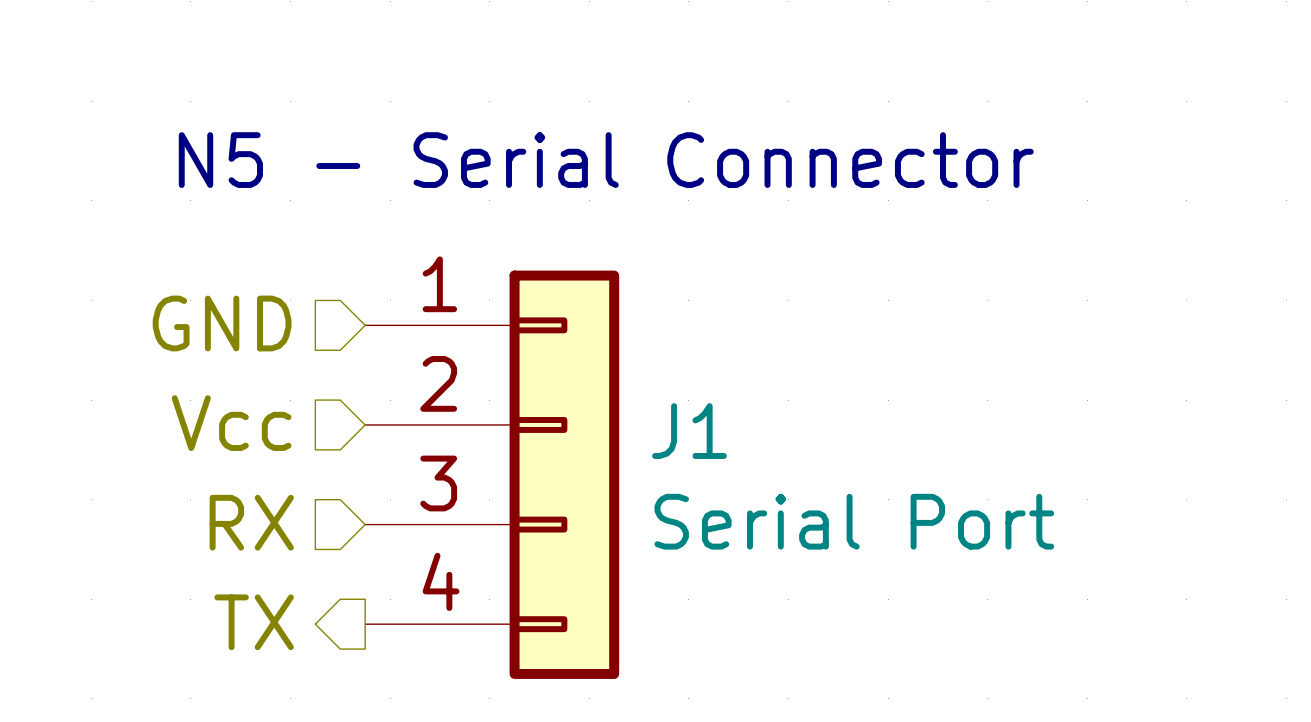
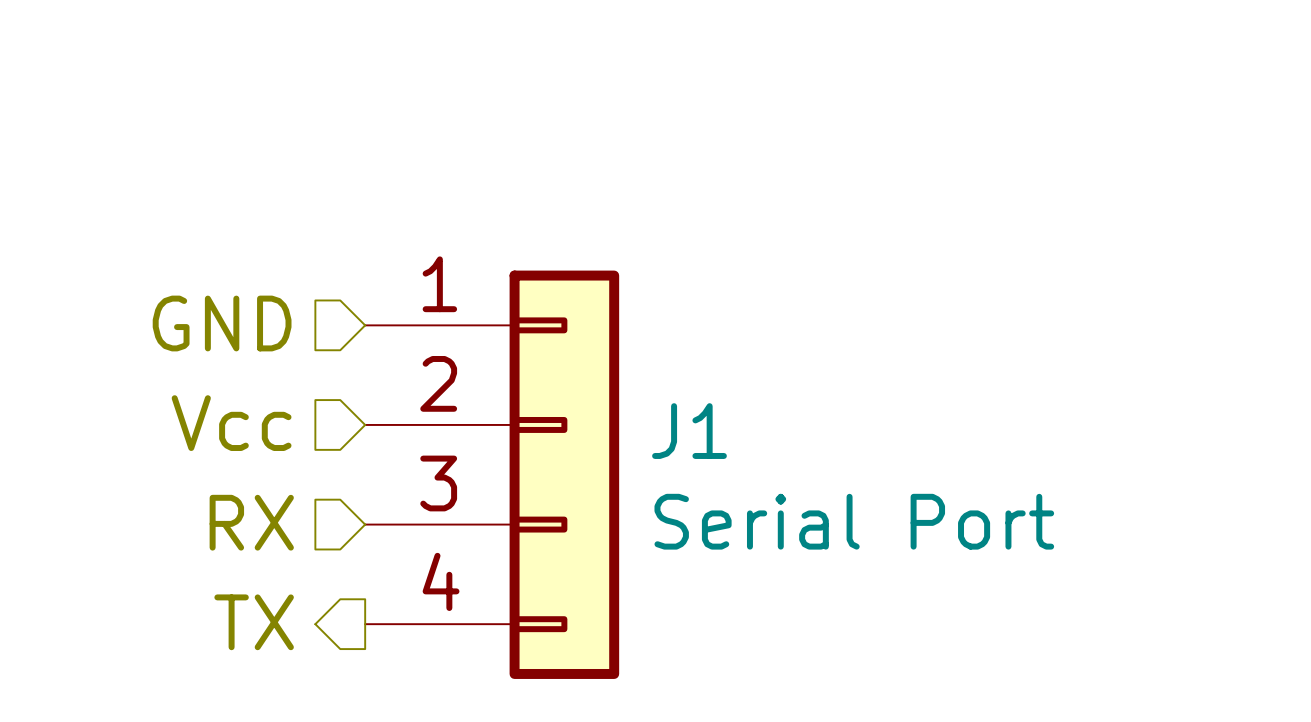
text: N5 - Serial Connector (606, 160) -> none

